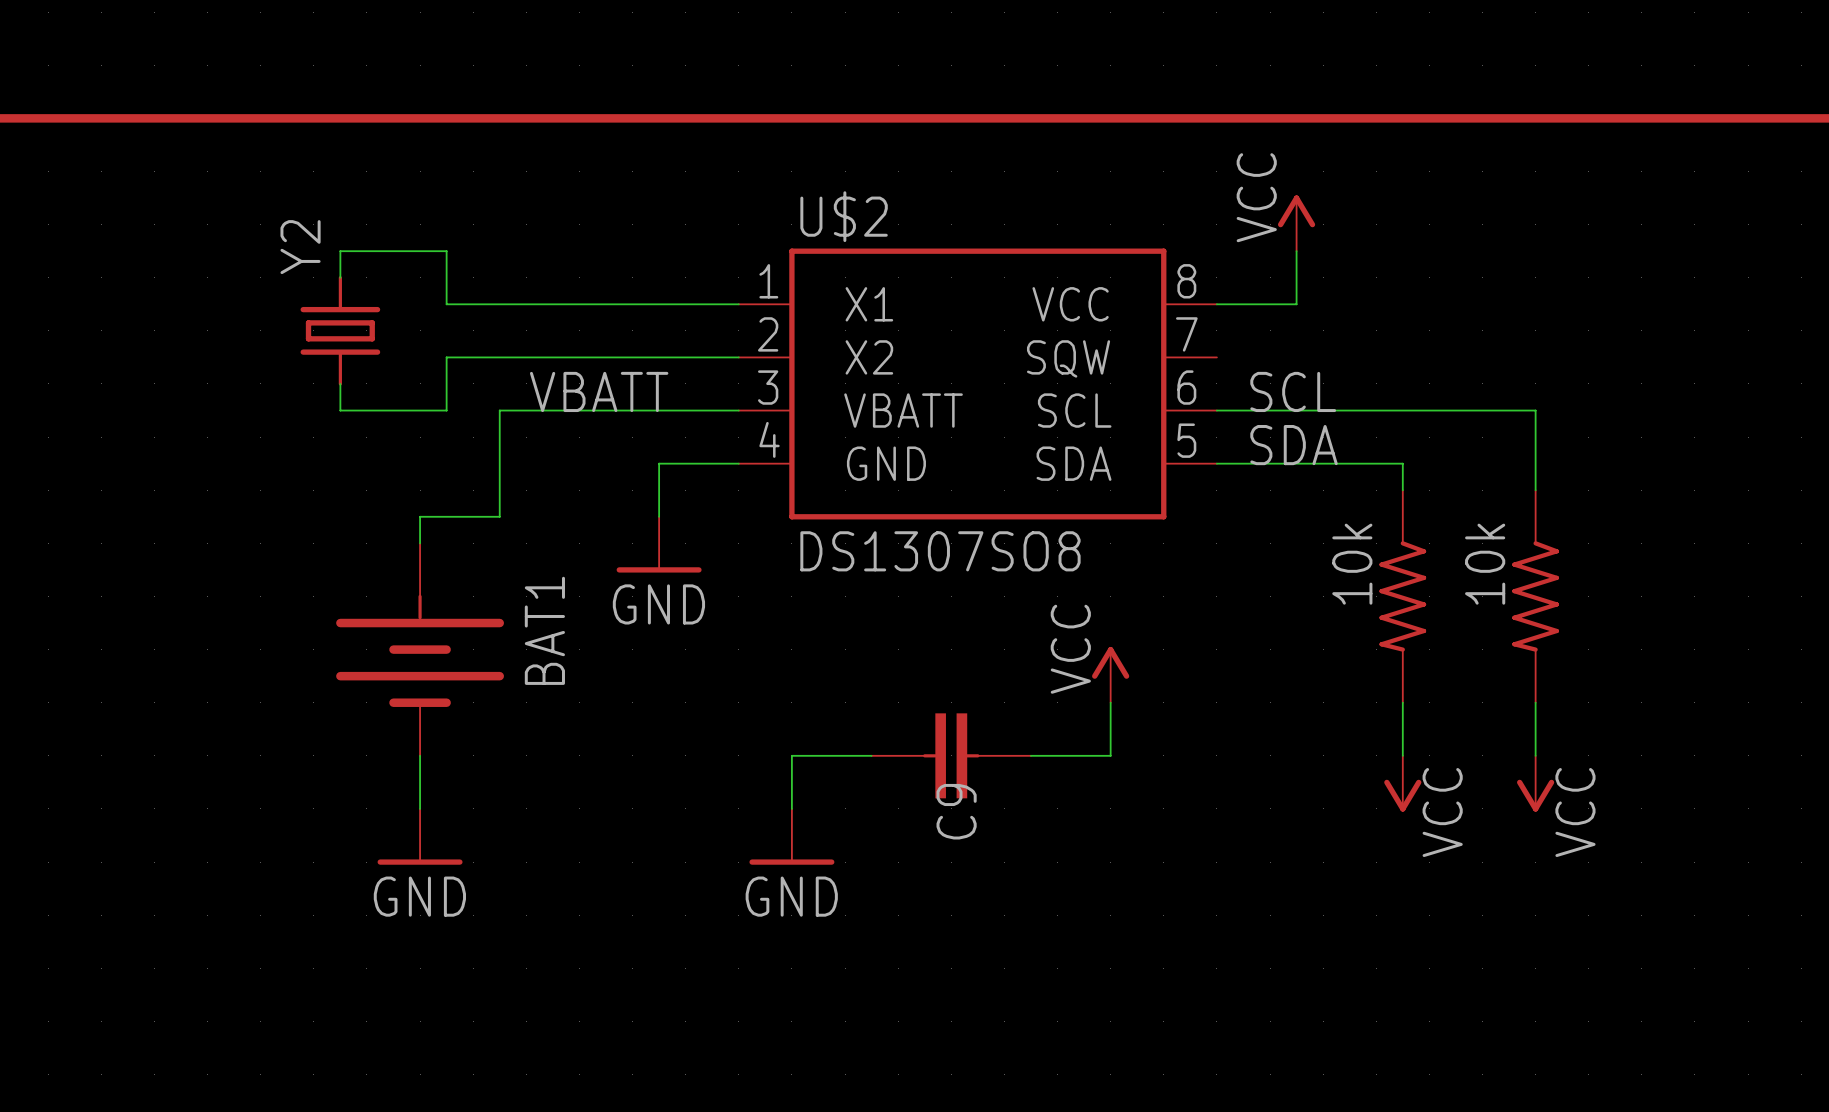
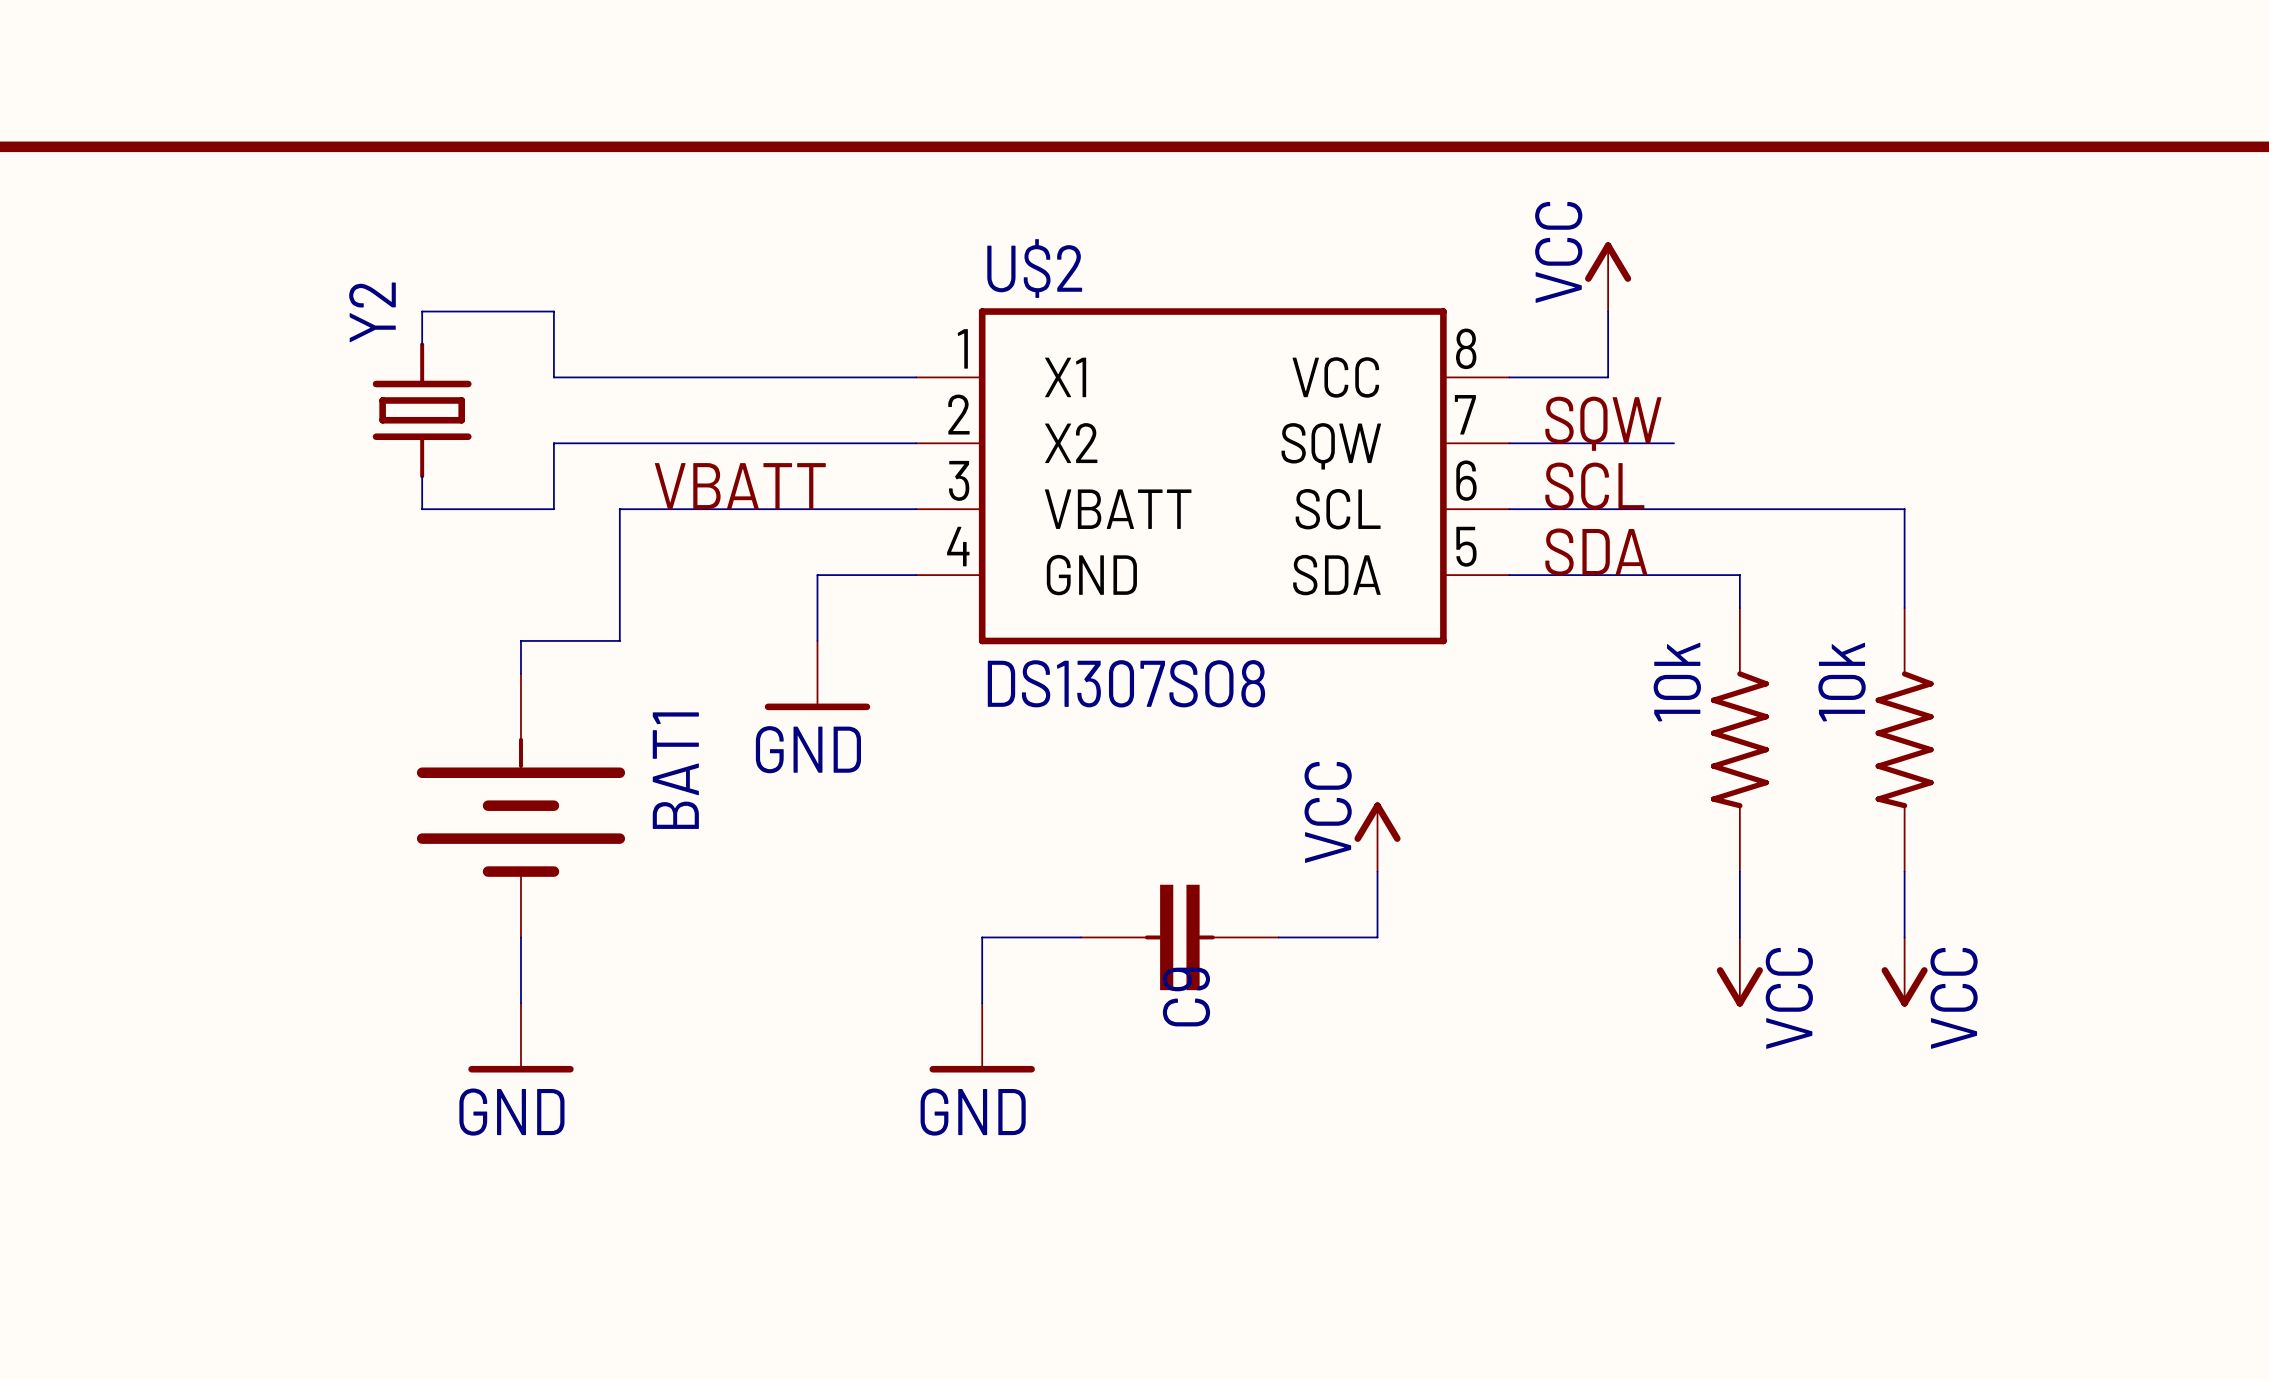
label: none -> SQW (1603, 423)
wire: none -> (1509, 443) (1674, 443)

